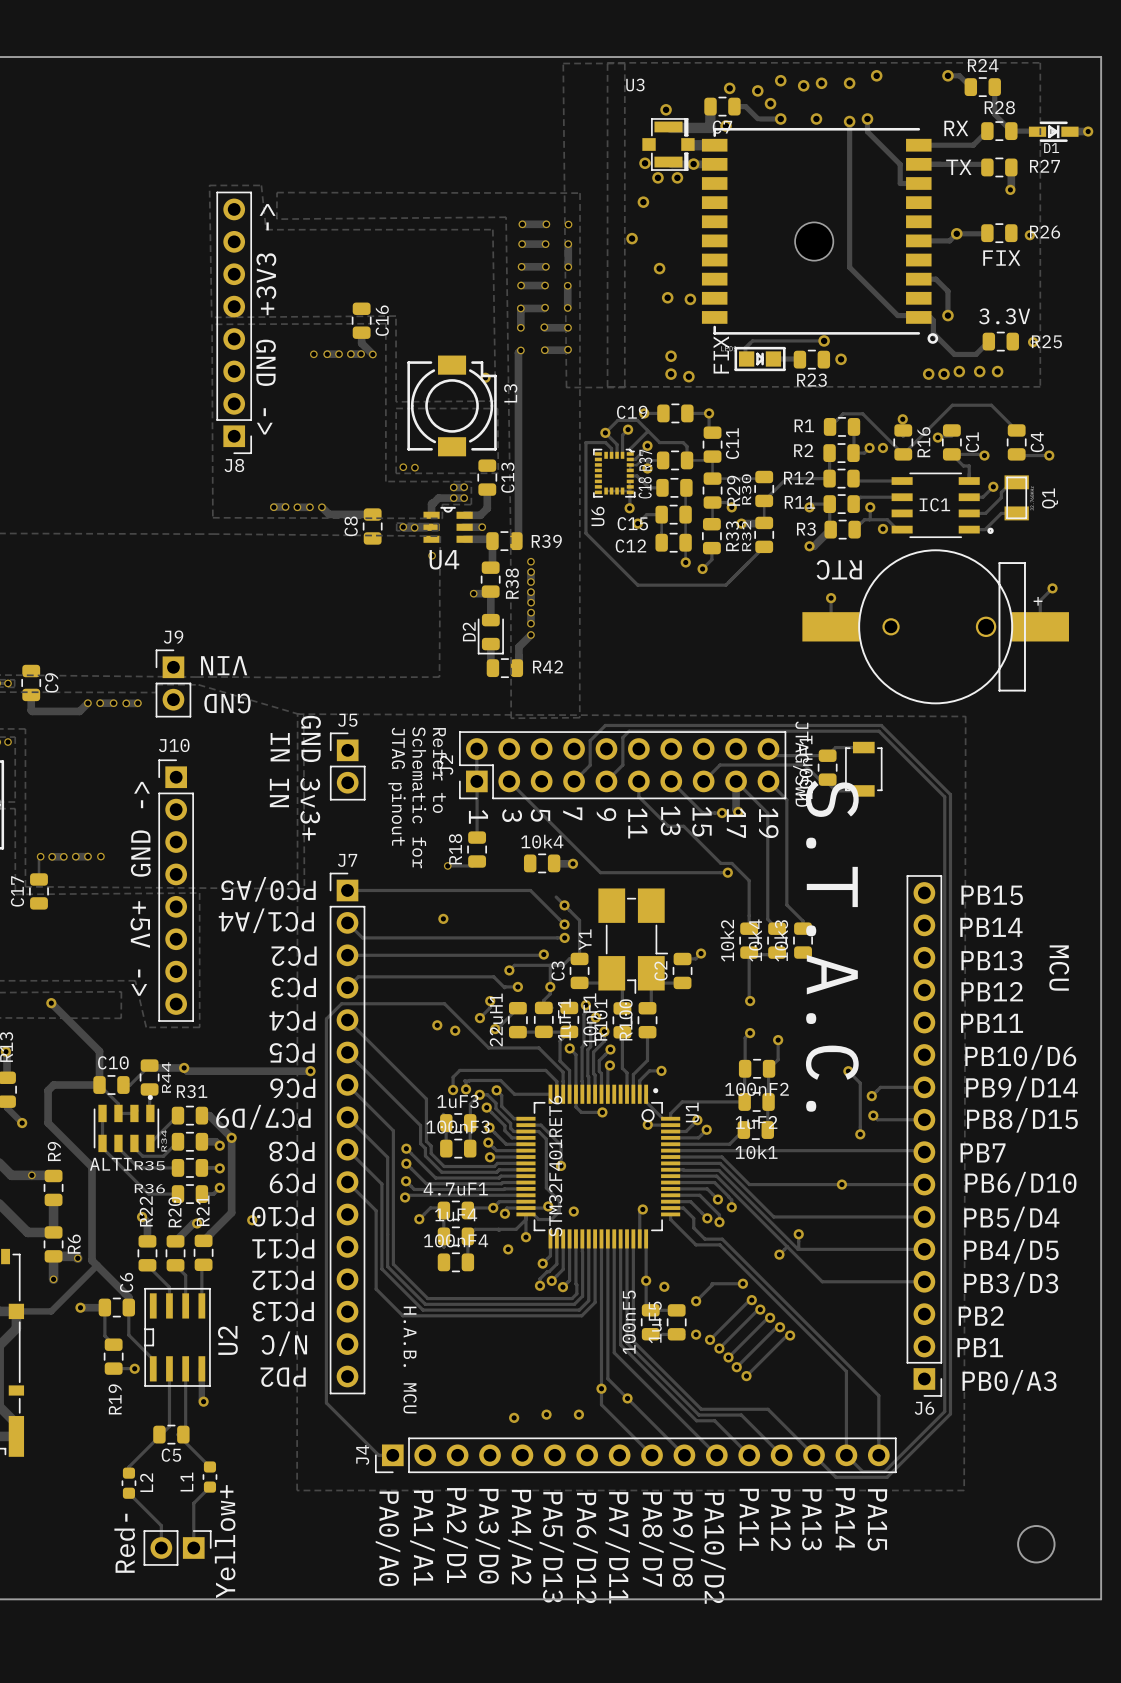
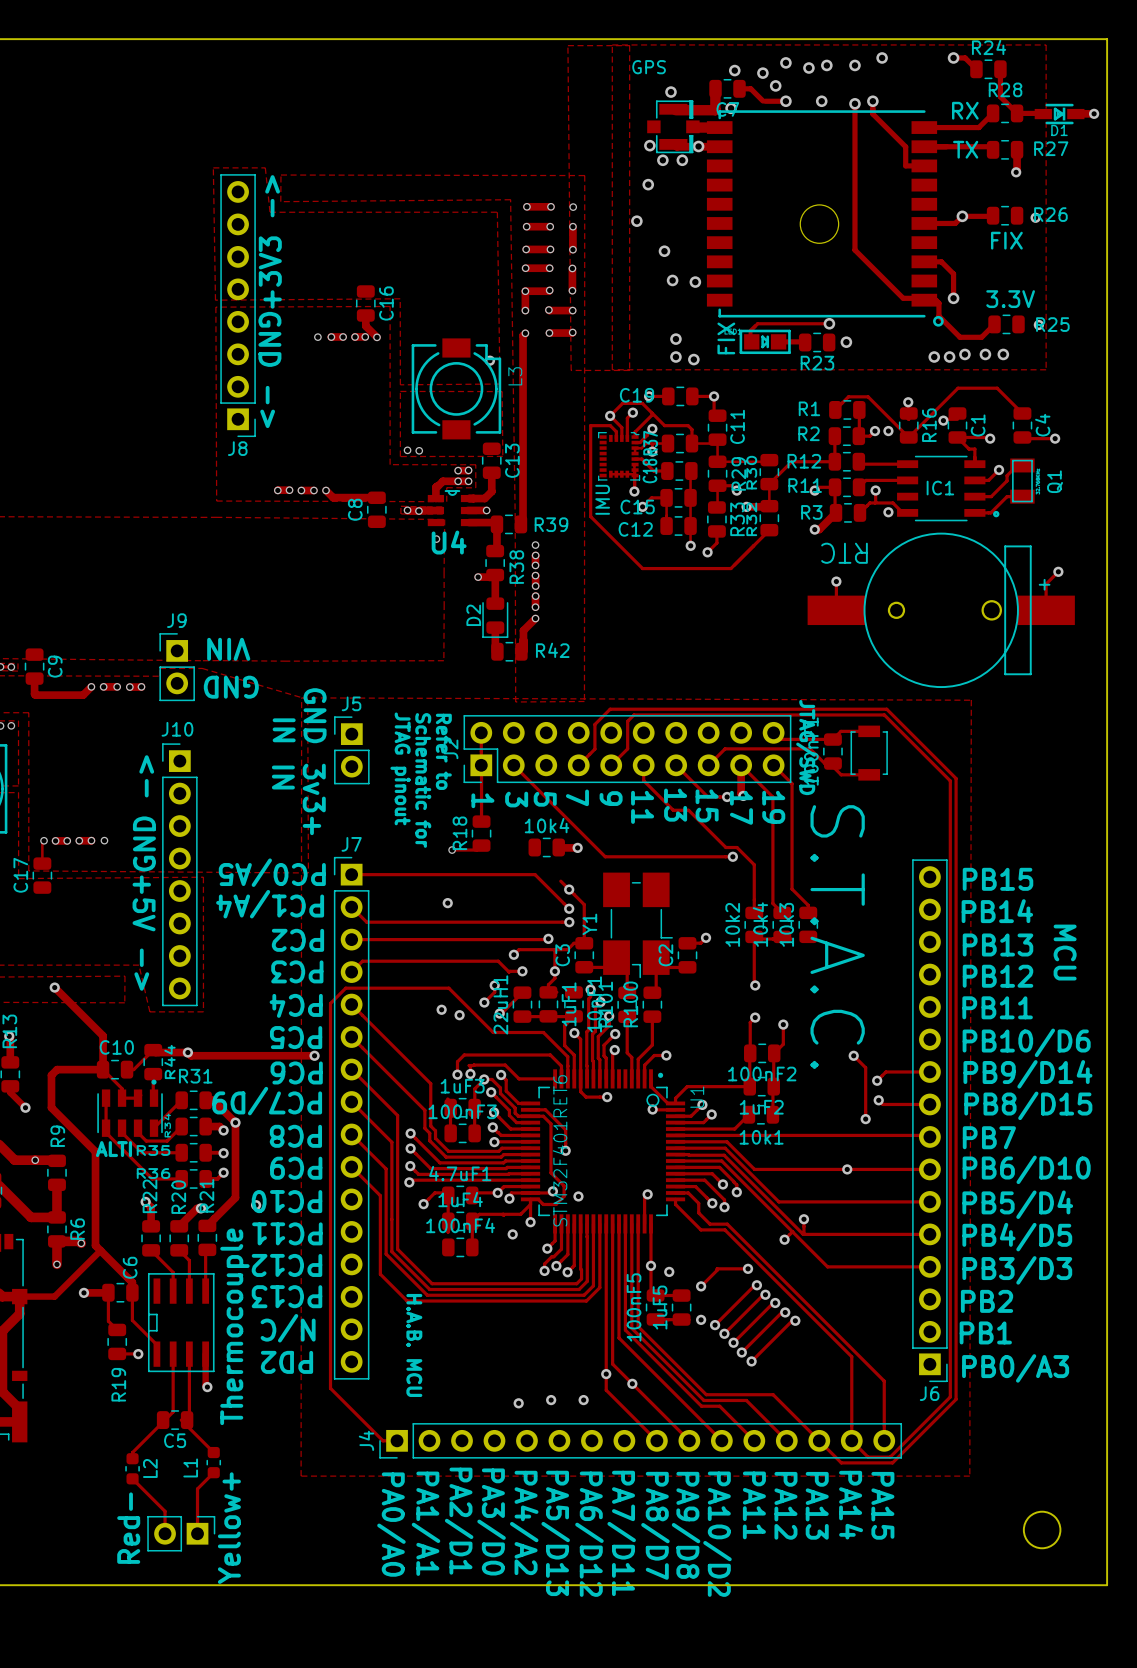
U3 name: U3 (635, 84) -> GPS (649, 67)
U6 name: U6 (598, 516) -> IMU (602, 499)
U2 name: U2 (227, 1340) -> Thermocouple (234, 1326)

